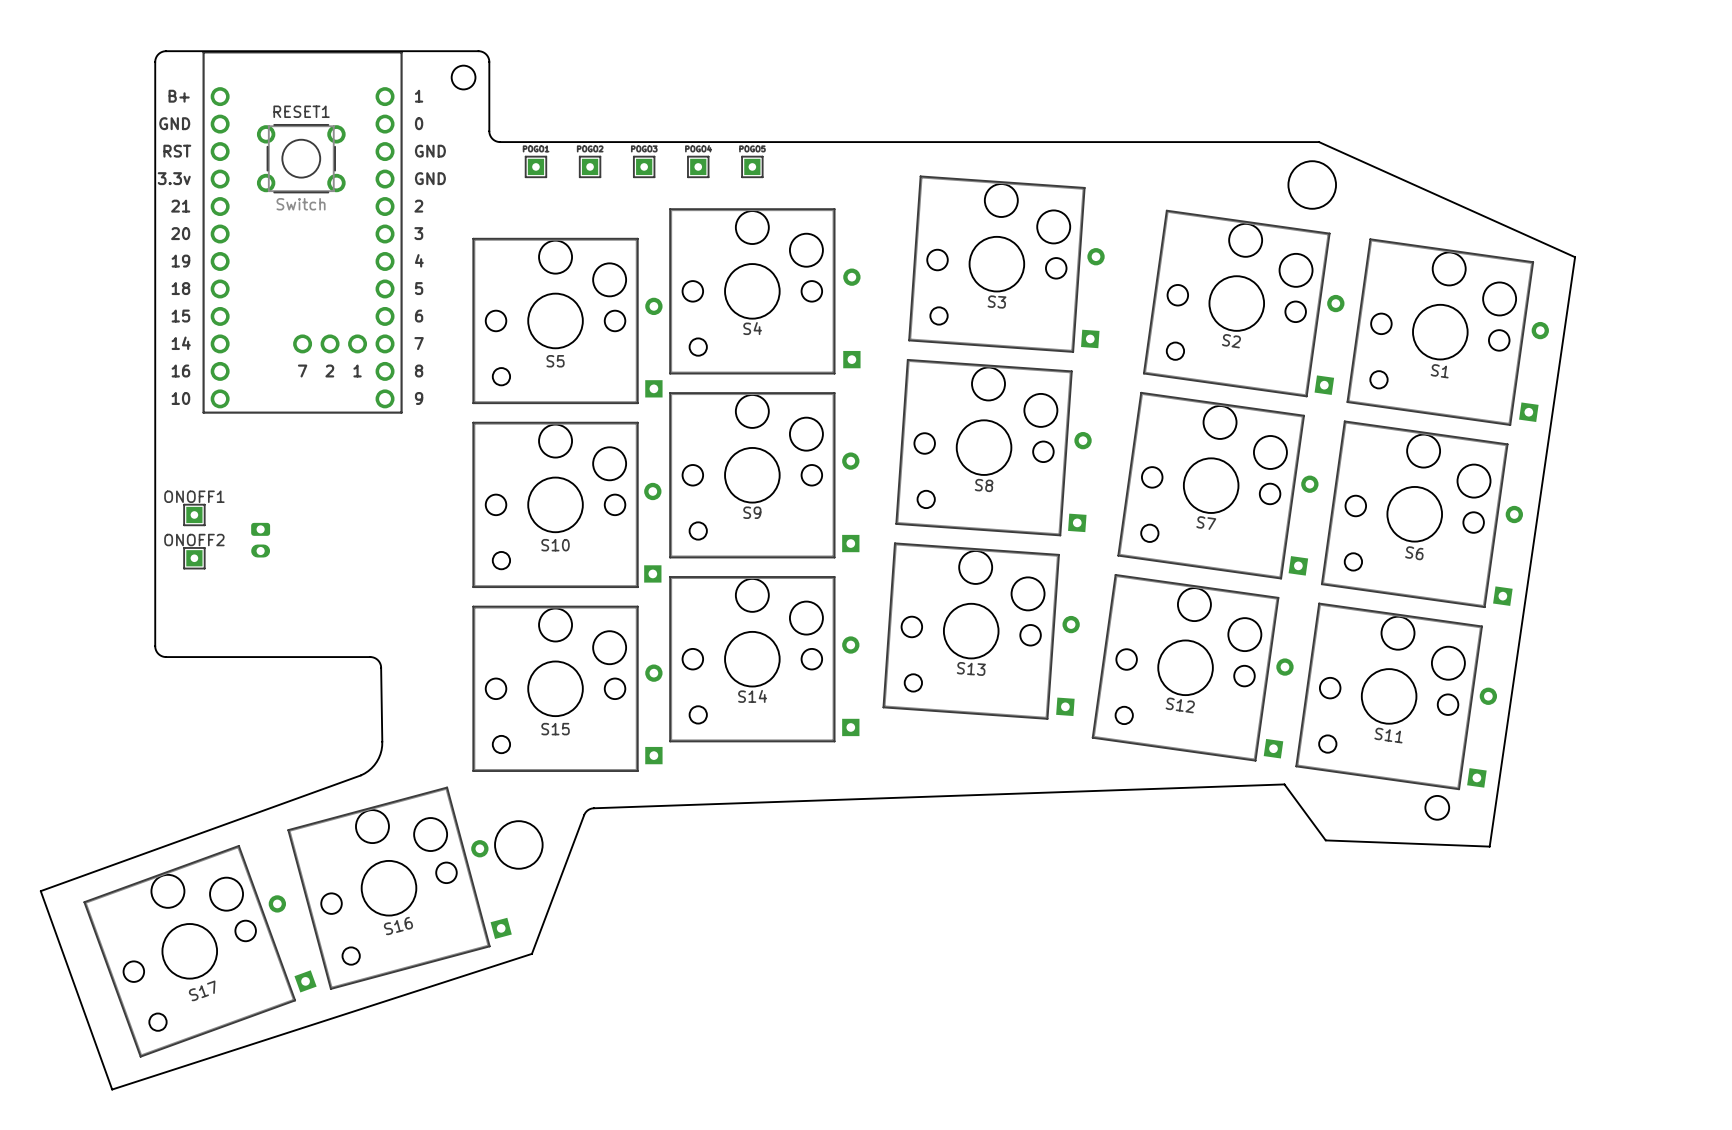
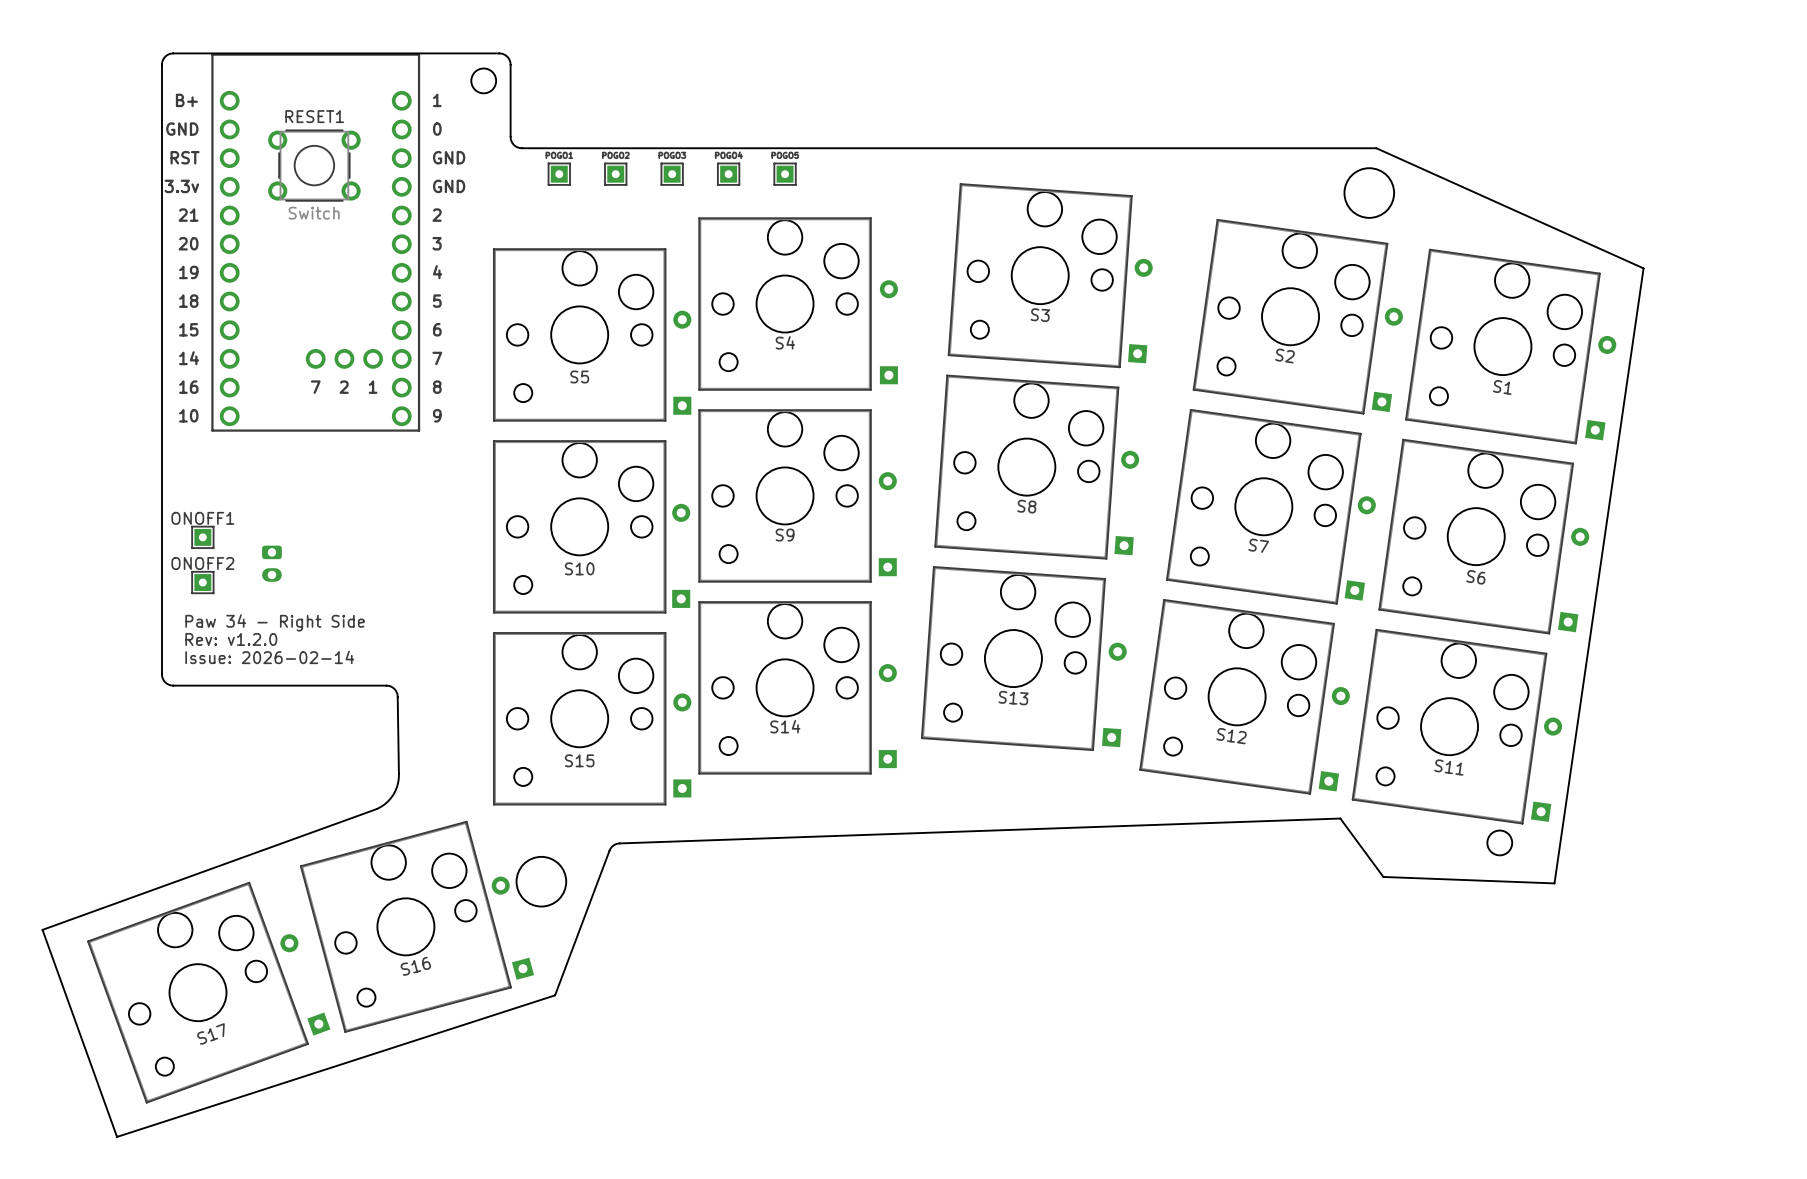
text: none -> Paw 34 - Right Side (275, 622)
text: none -> Rev: v1.2.0 (231, 639)
text: none -> Issue: 2026-02-14 (269, 657)

